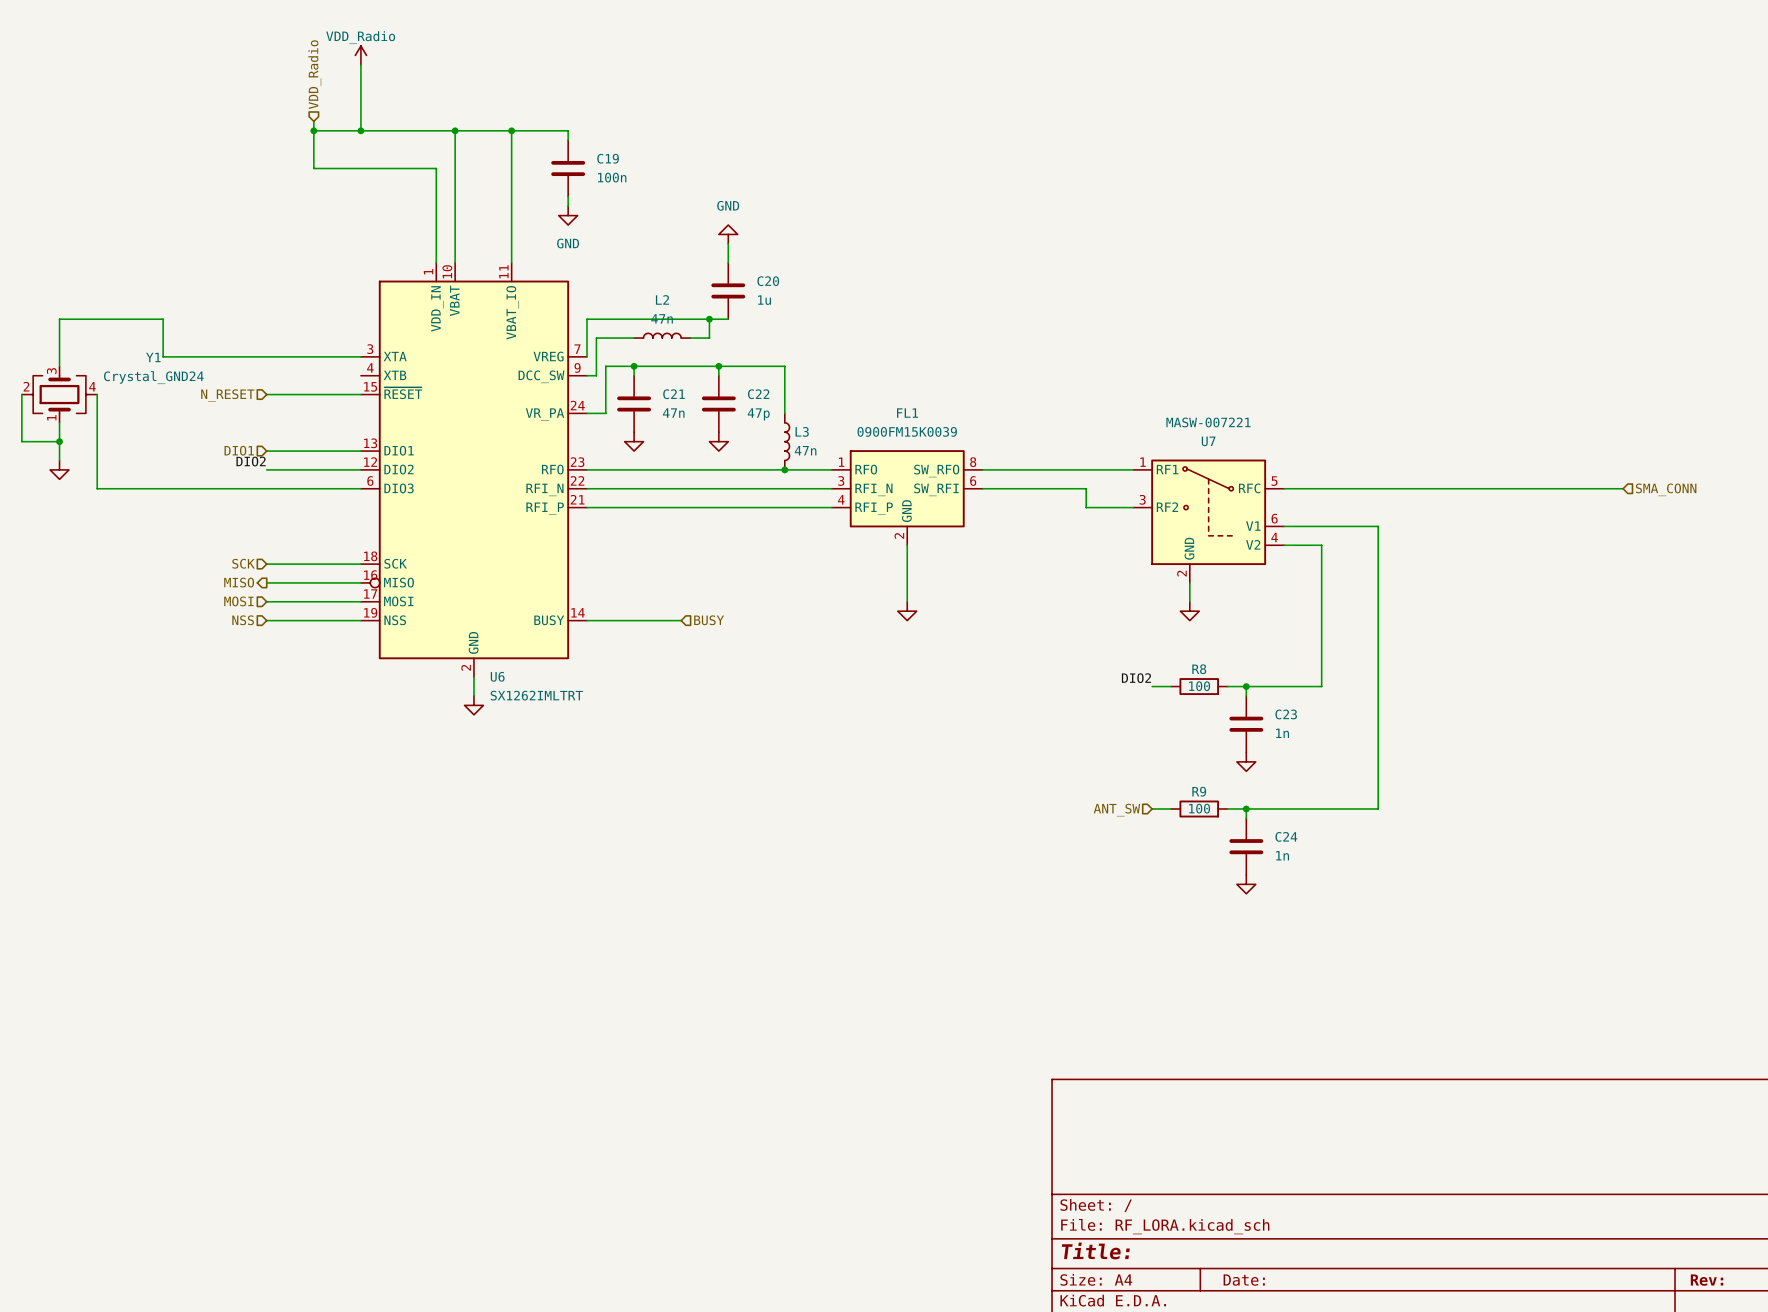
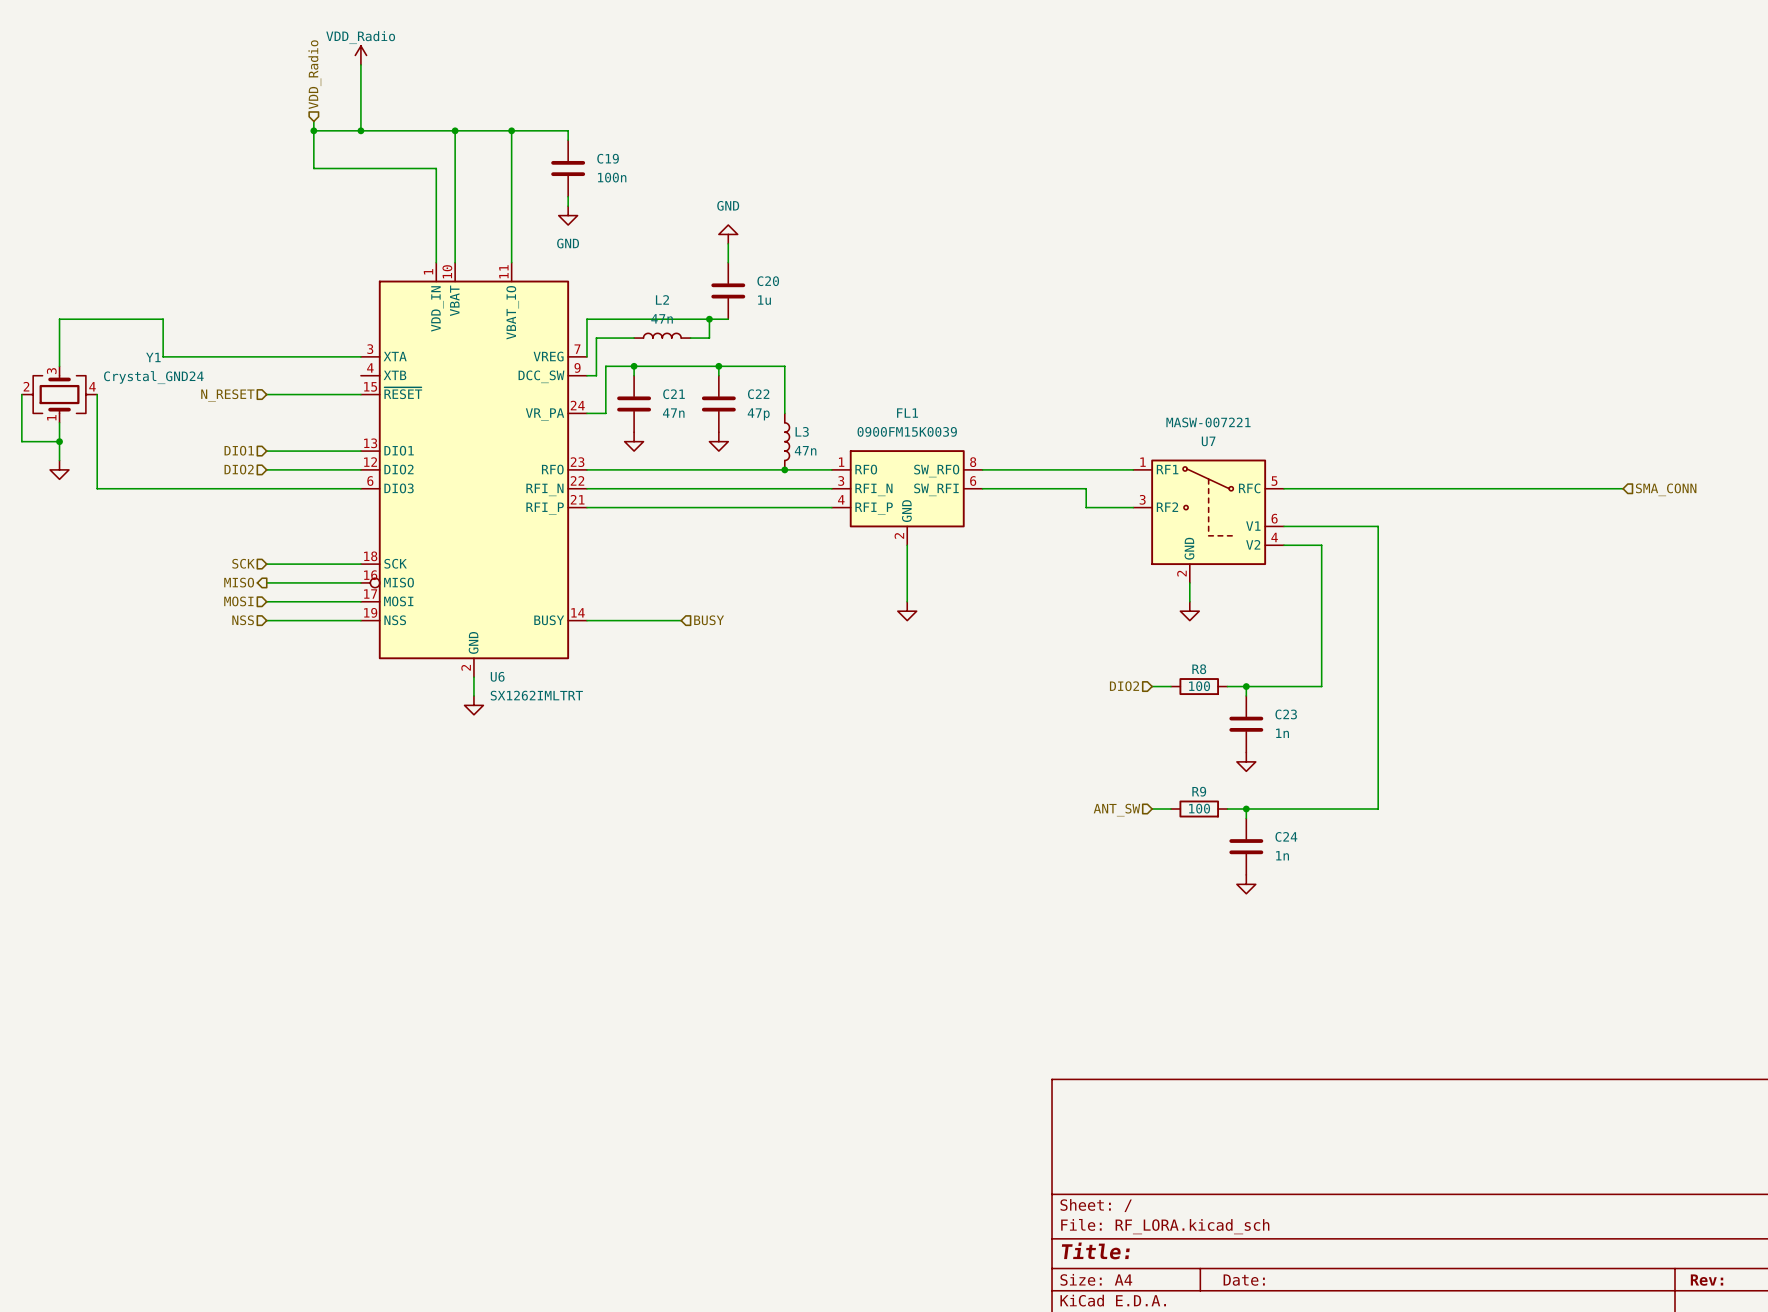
label: DIO2 (251, 461) -> none
hierarchical label: none -> DIO2 (239, 469)
label: DIO2 (1136, 678) -> none
hierarchical label: none -> DIO2 (1124, 686)

